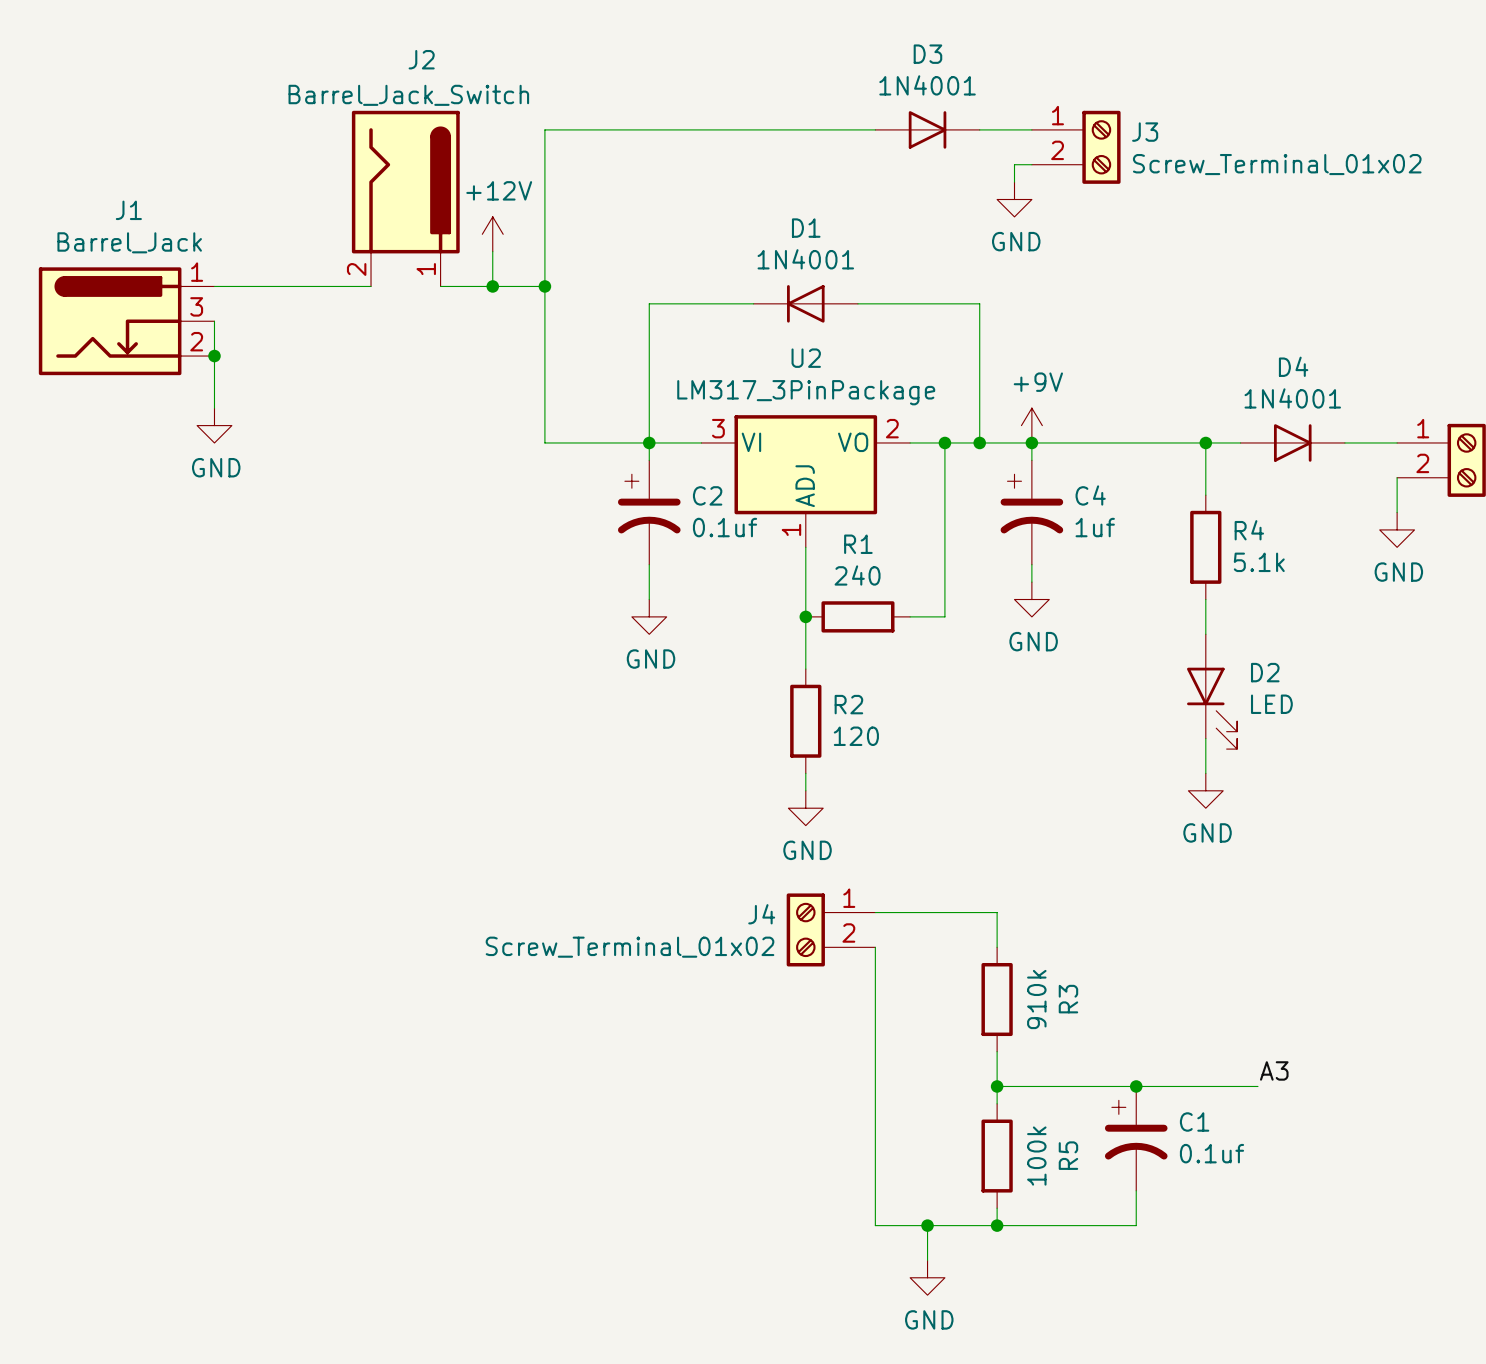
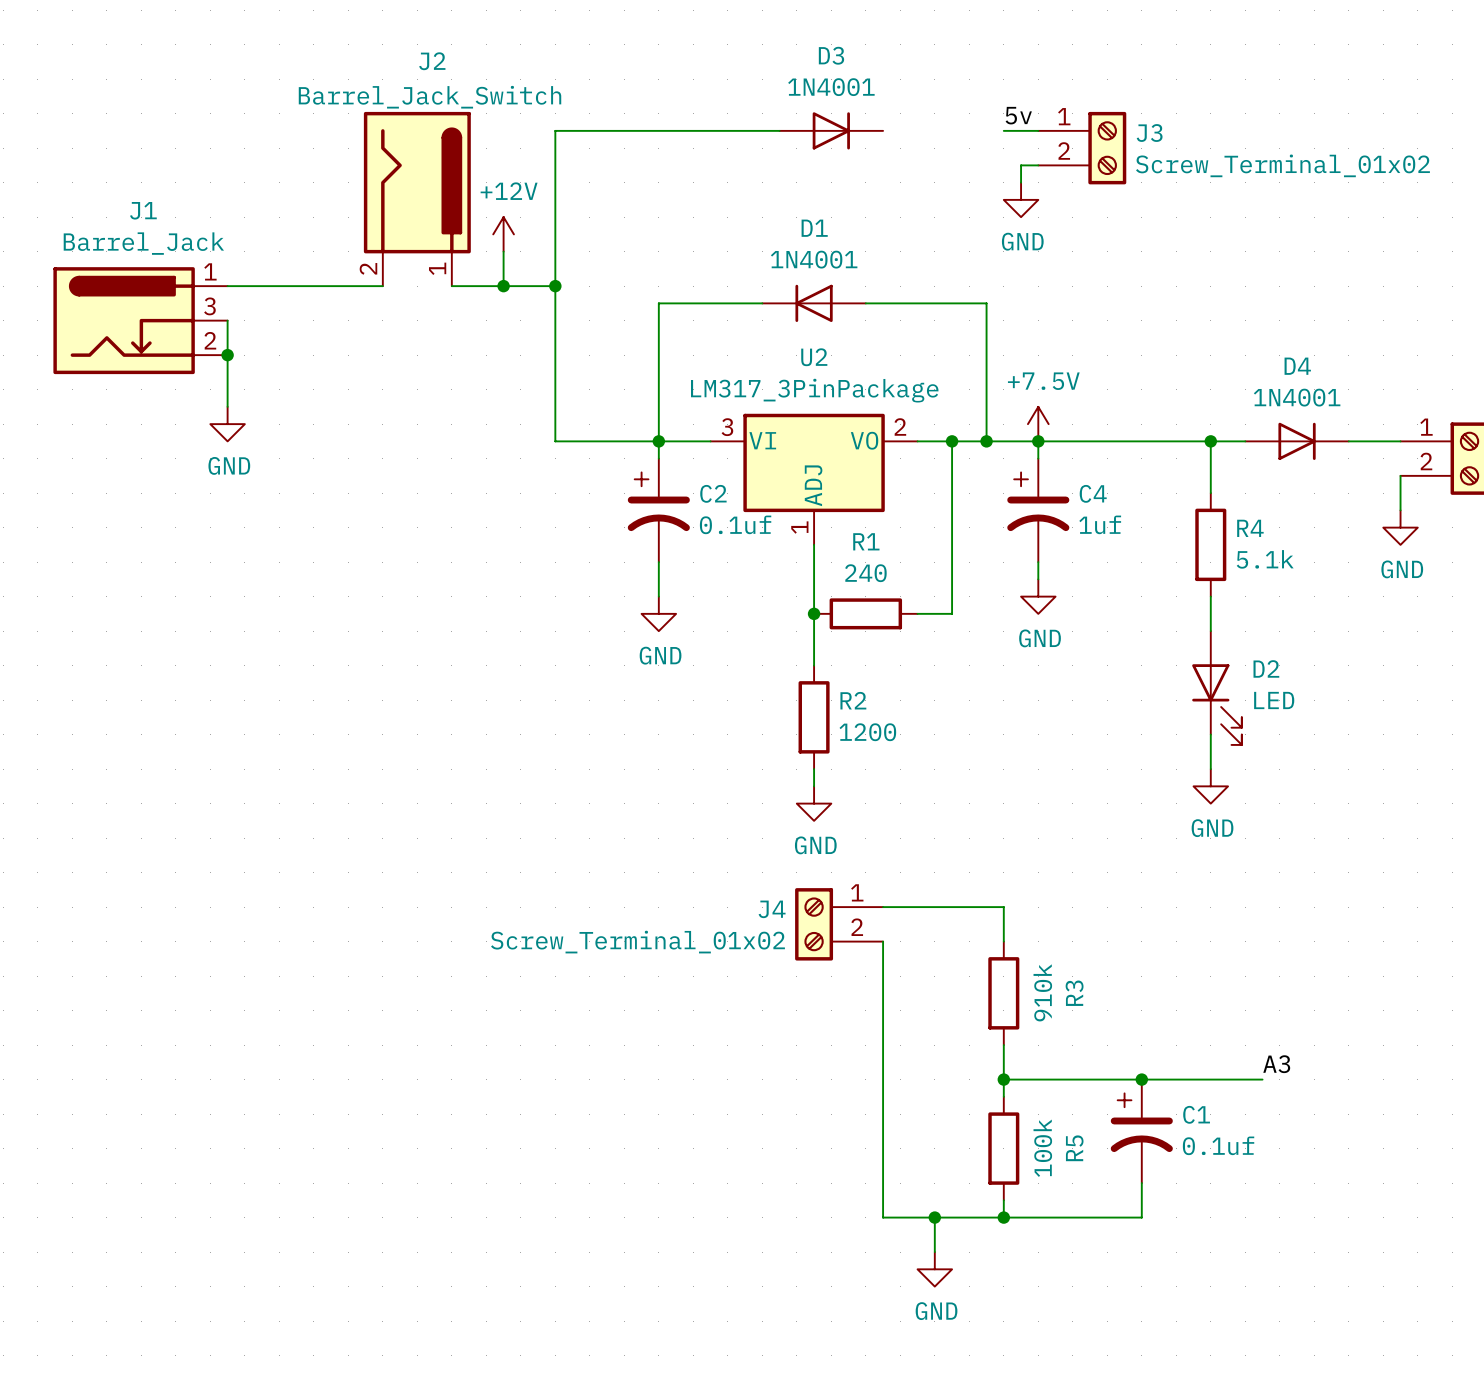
label: none -> 5v (1018, 115)
D3 position: (927, 129) -> (831, 130)
wire: (979, 129) (997, 129) -> none
power symbol: +9V (1031, 425) -> +7.5V (1038, 424)
R2 value: 120 (856, 736) -> 1200 (867, 732)

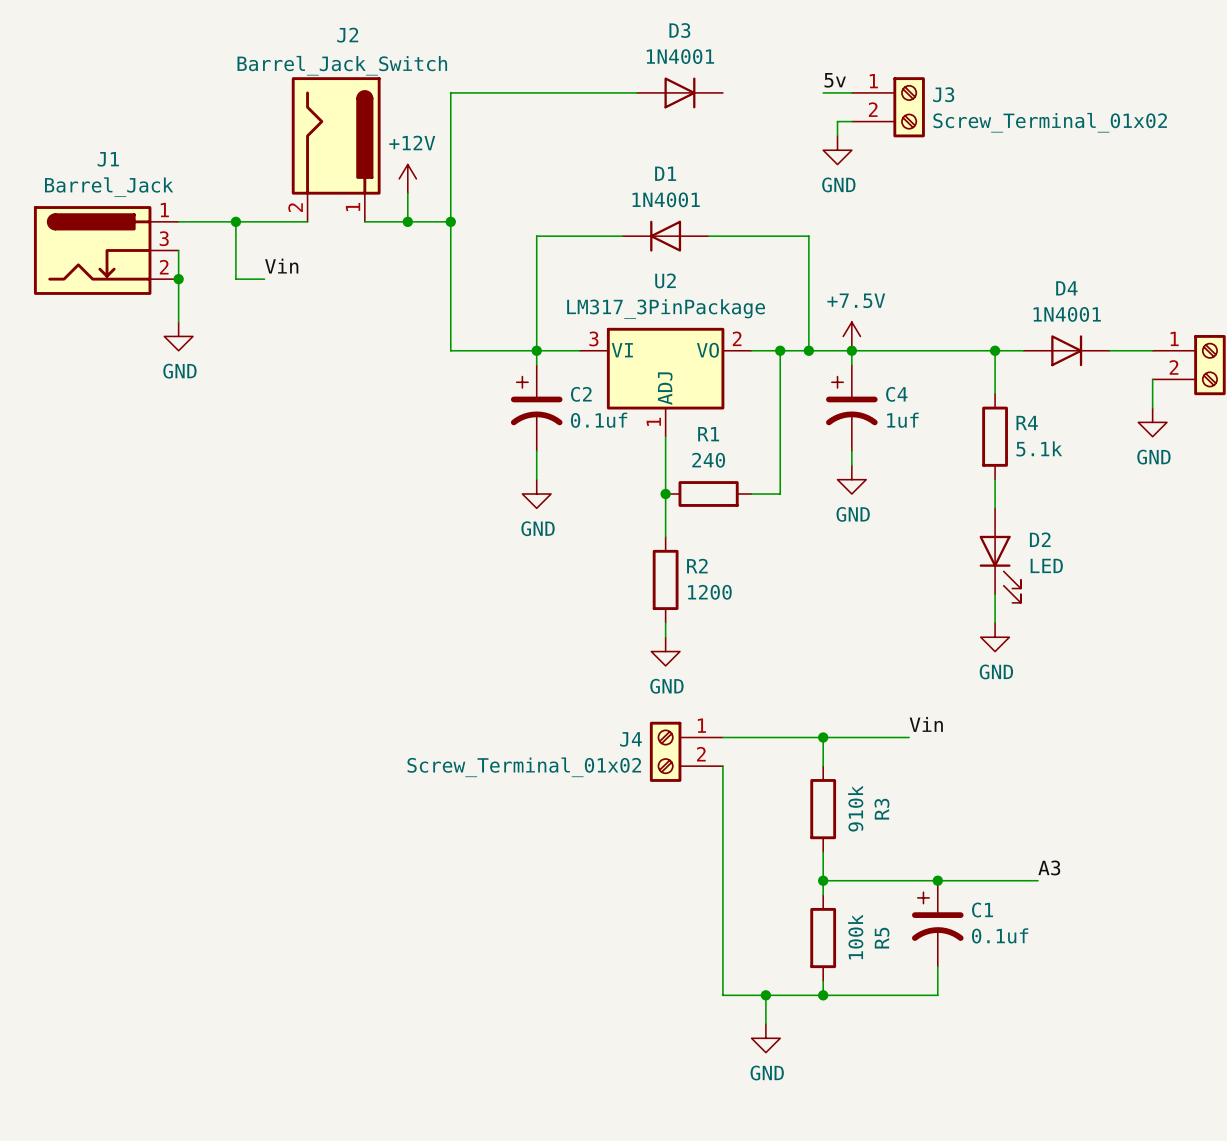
wire: none -> (235, 221) (235, 279) (264, 279)
junction: none -> (235, 221)
label: none -> Vin (281, 266)
label: none -> Vin (926, 724)
wire: none -> (823, 737) (909, 737)
junction: none -> (823, 737)

